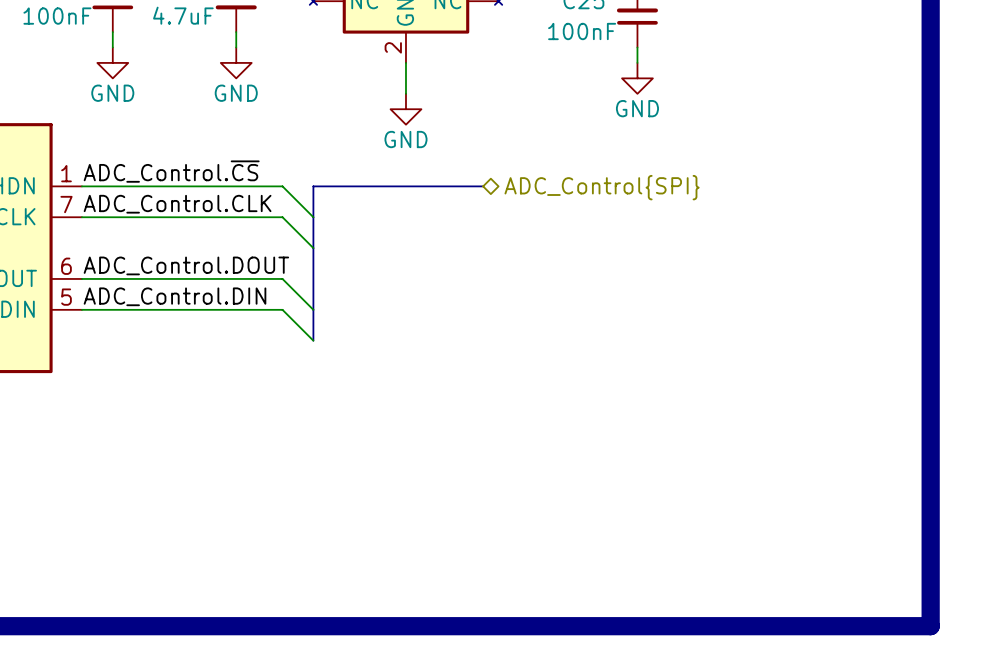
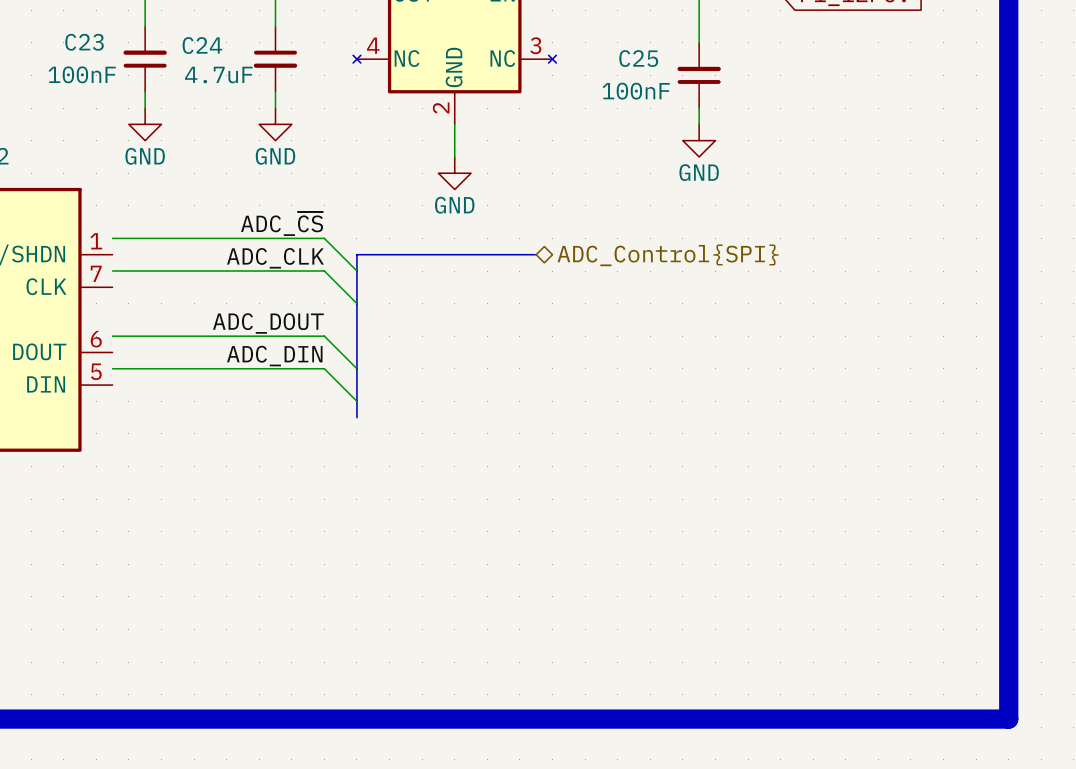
label: ADC_Control.~{CS} (171, 171) -> ADC_~{CS} (282, 223)
wire: (81, 186) (282, 186) (313, 217) -> (112, 238) (324, 238) (356, 271)
label: ADC_Control.CLK (177, 204) -> ADC_CLK (275, 258)
wire: (81, 217) (282, 217) (313, 248) -> (112, 271) (324, 271) (356, 303)
label: ADC_Control.DOUT (186, 265) -> ADC_DOUT (268, 323)
wire: (81, 278) (282, 278) (313, 309) -> (112, 336) (324, 336) (356, 368)
label: ADC_Control.DIN (175, 296) -> ADC_DIN (274, 356)
wire: (81, 309) (282, 309) (313, 340) -> (112, 368) (324, 368) (356, 401)

